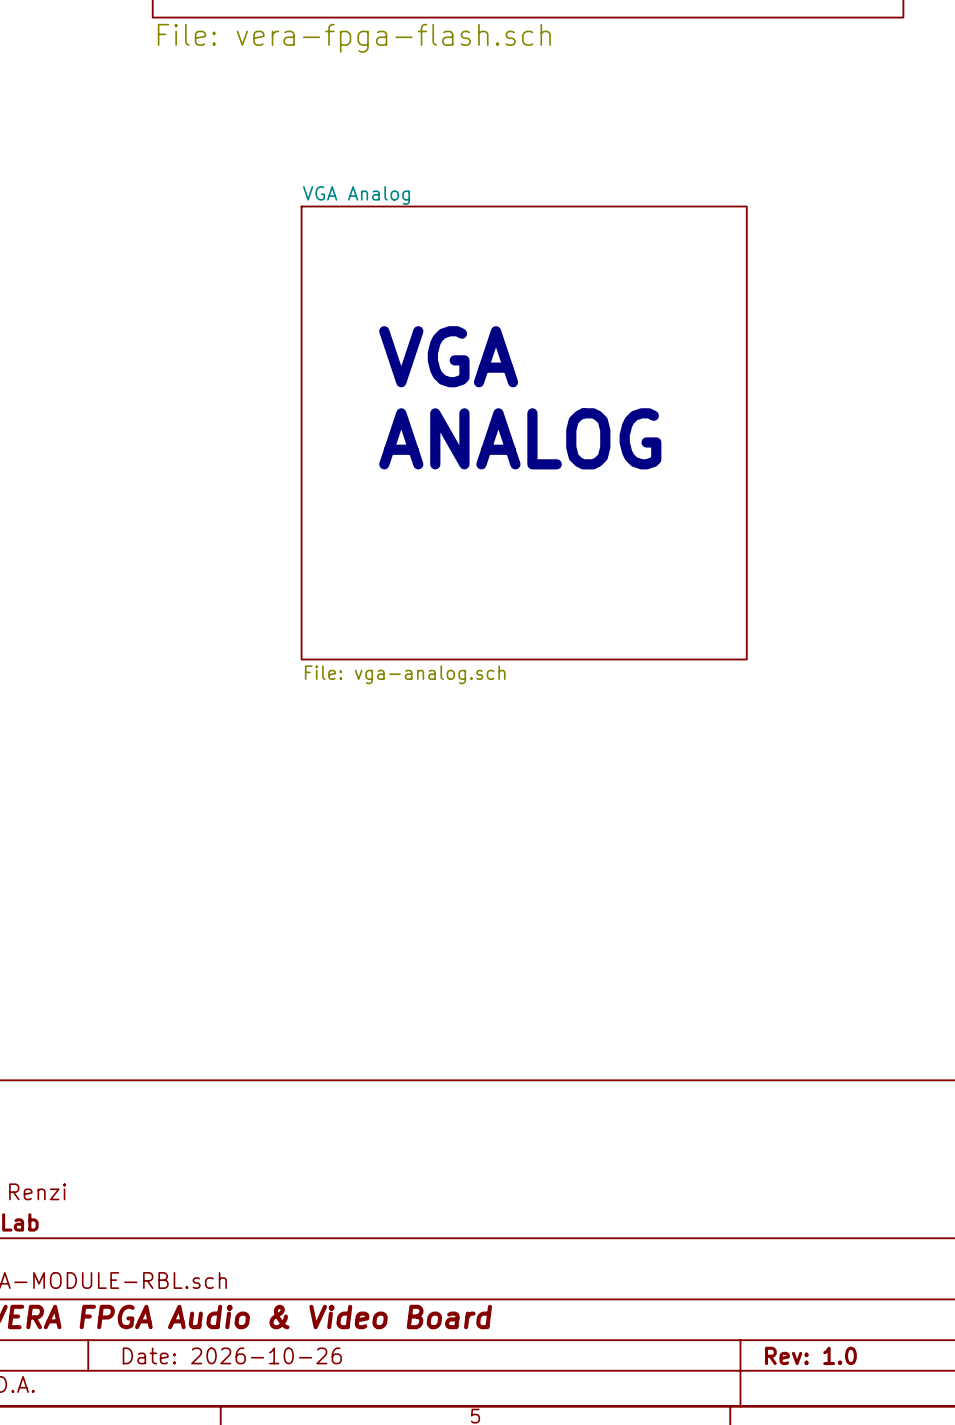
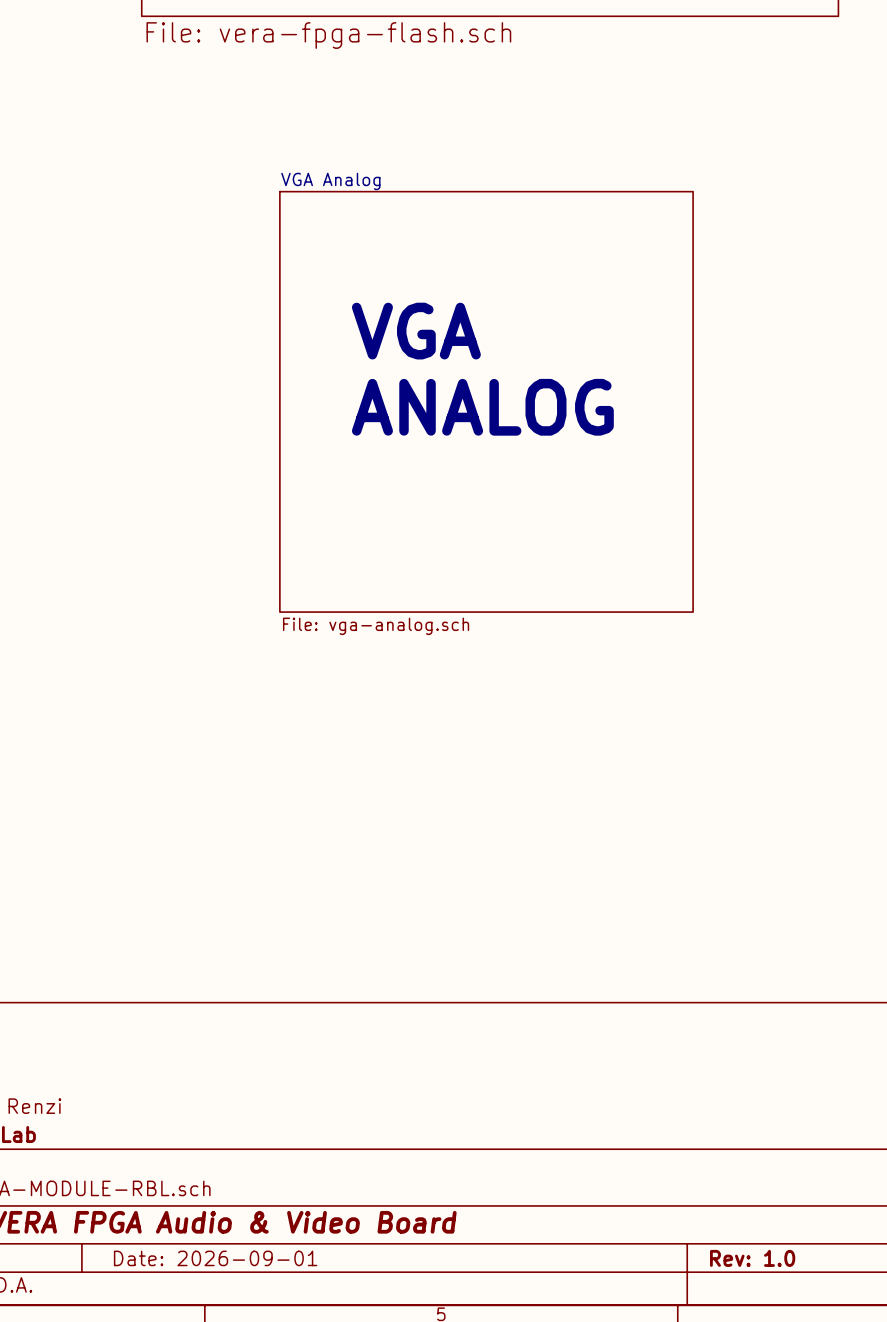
title block: Date: 2026-10-26 (232, 1355) -> Date: 2026-09-01 (215, 1258)

